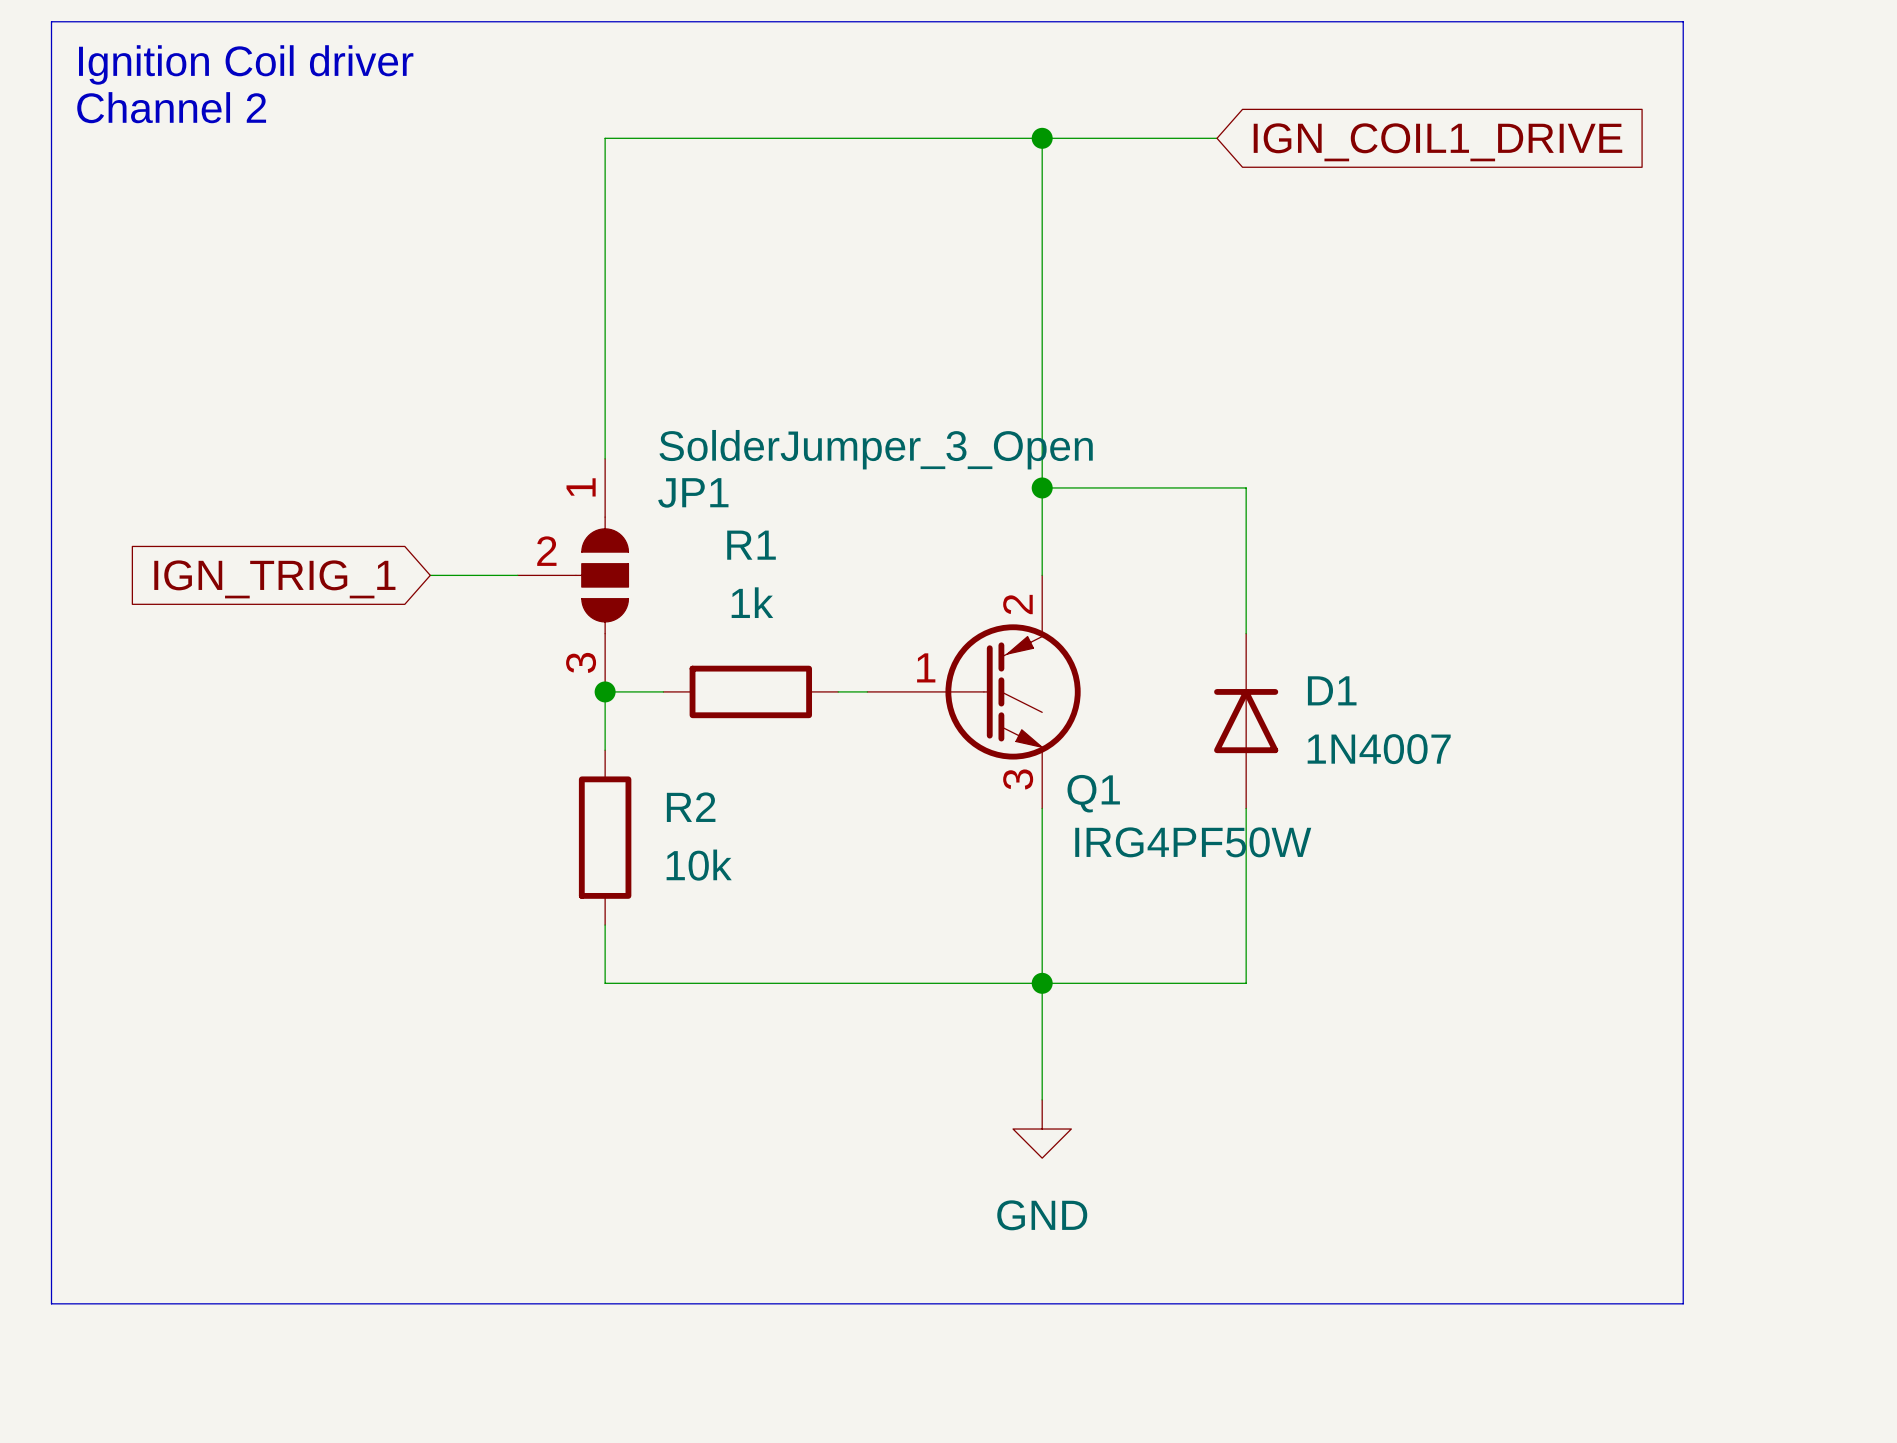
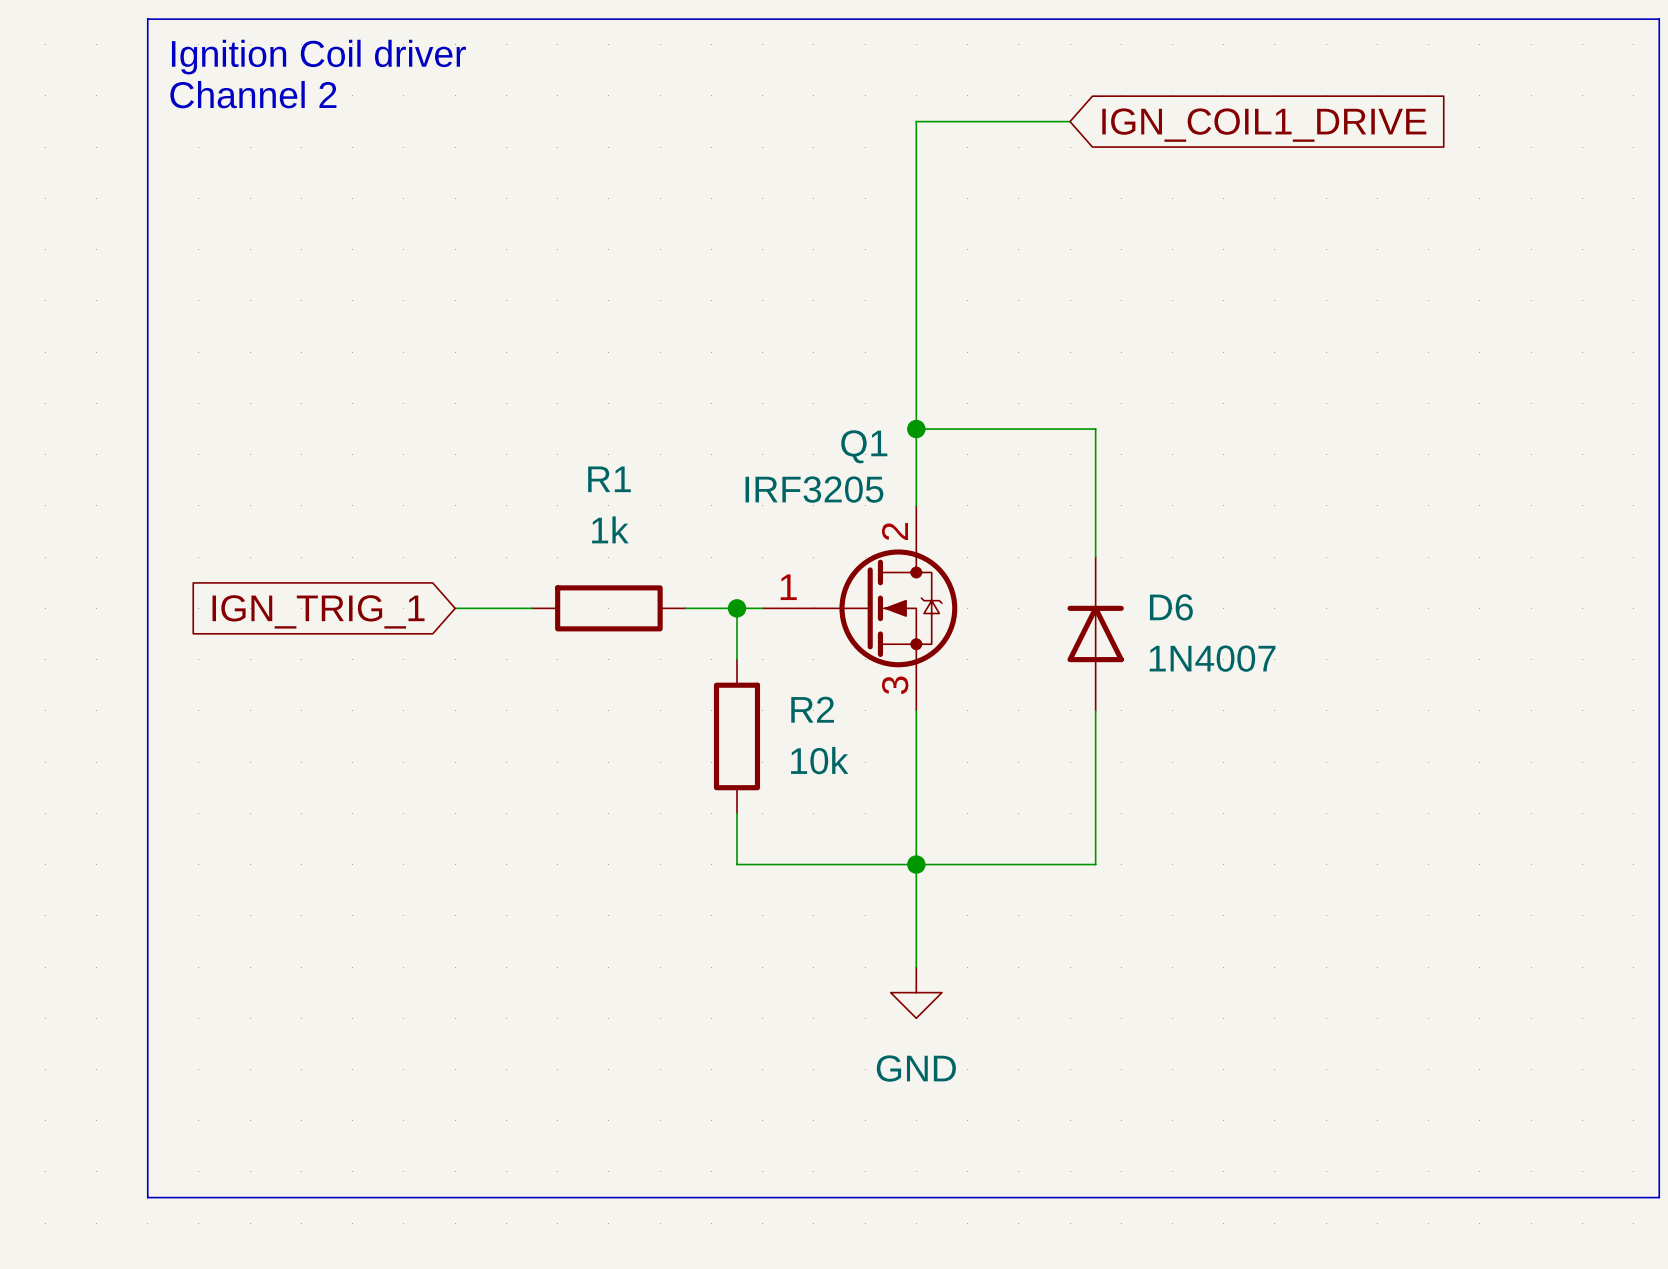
line: (168, 21) (51, 21) (51, 1303) (1683, 1303) (1683, 21) -> (147, 19) (147, 1197) (1659, 1197) (1659, 19) (1479, 19)
text position: Ignition Coil driver (246, 64) -> Ignition Coil driver (318, 57)
text position: Channel 2 (171, 107) -> Channel 2 (253, 94)
wire: (1042, 138) (605, 138) (605, 458) -> none
junction: (1042, 138) -> none
wire: (430, 575) (517, 575) -> (455, 608) (532, 608)
JP1: SolderJumper_3_Open (573, 575) -> none
Q1 symbol: [867, 575, 1081, 809] -> [762, 505, 958, 711]
global label position: IGN_TRIG_1 (274, 579) -> IGN_TRIG_1 (318, 611)
D1 name: D1 (1332, 690) -> D6 (1171, 607)
junction: (605, 691) -> none
wire: (663, 691) (605, 691) (605, 750) -> none
R1 position: (750, 691) -> (608, 608)
wire: none -> (685, 608) (736, 608) (736, 659)
junction: none -> (736, 608)
Q1 name position: Q1 (1093, 793) -> Q1 (864, 446)
R2 position: (605, 837) -> (736, 736)
Q1 value: IRG4PF50W (1193, 842) -> IRF3205 (814, 489)
wire: (605, 925) (605, 983) (838, 983) -> (736, 813) (736, 864)

